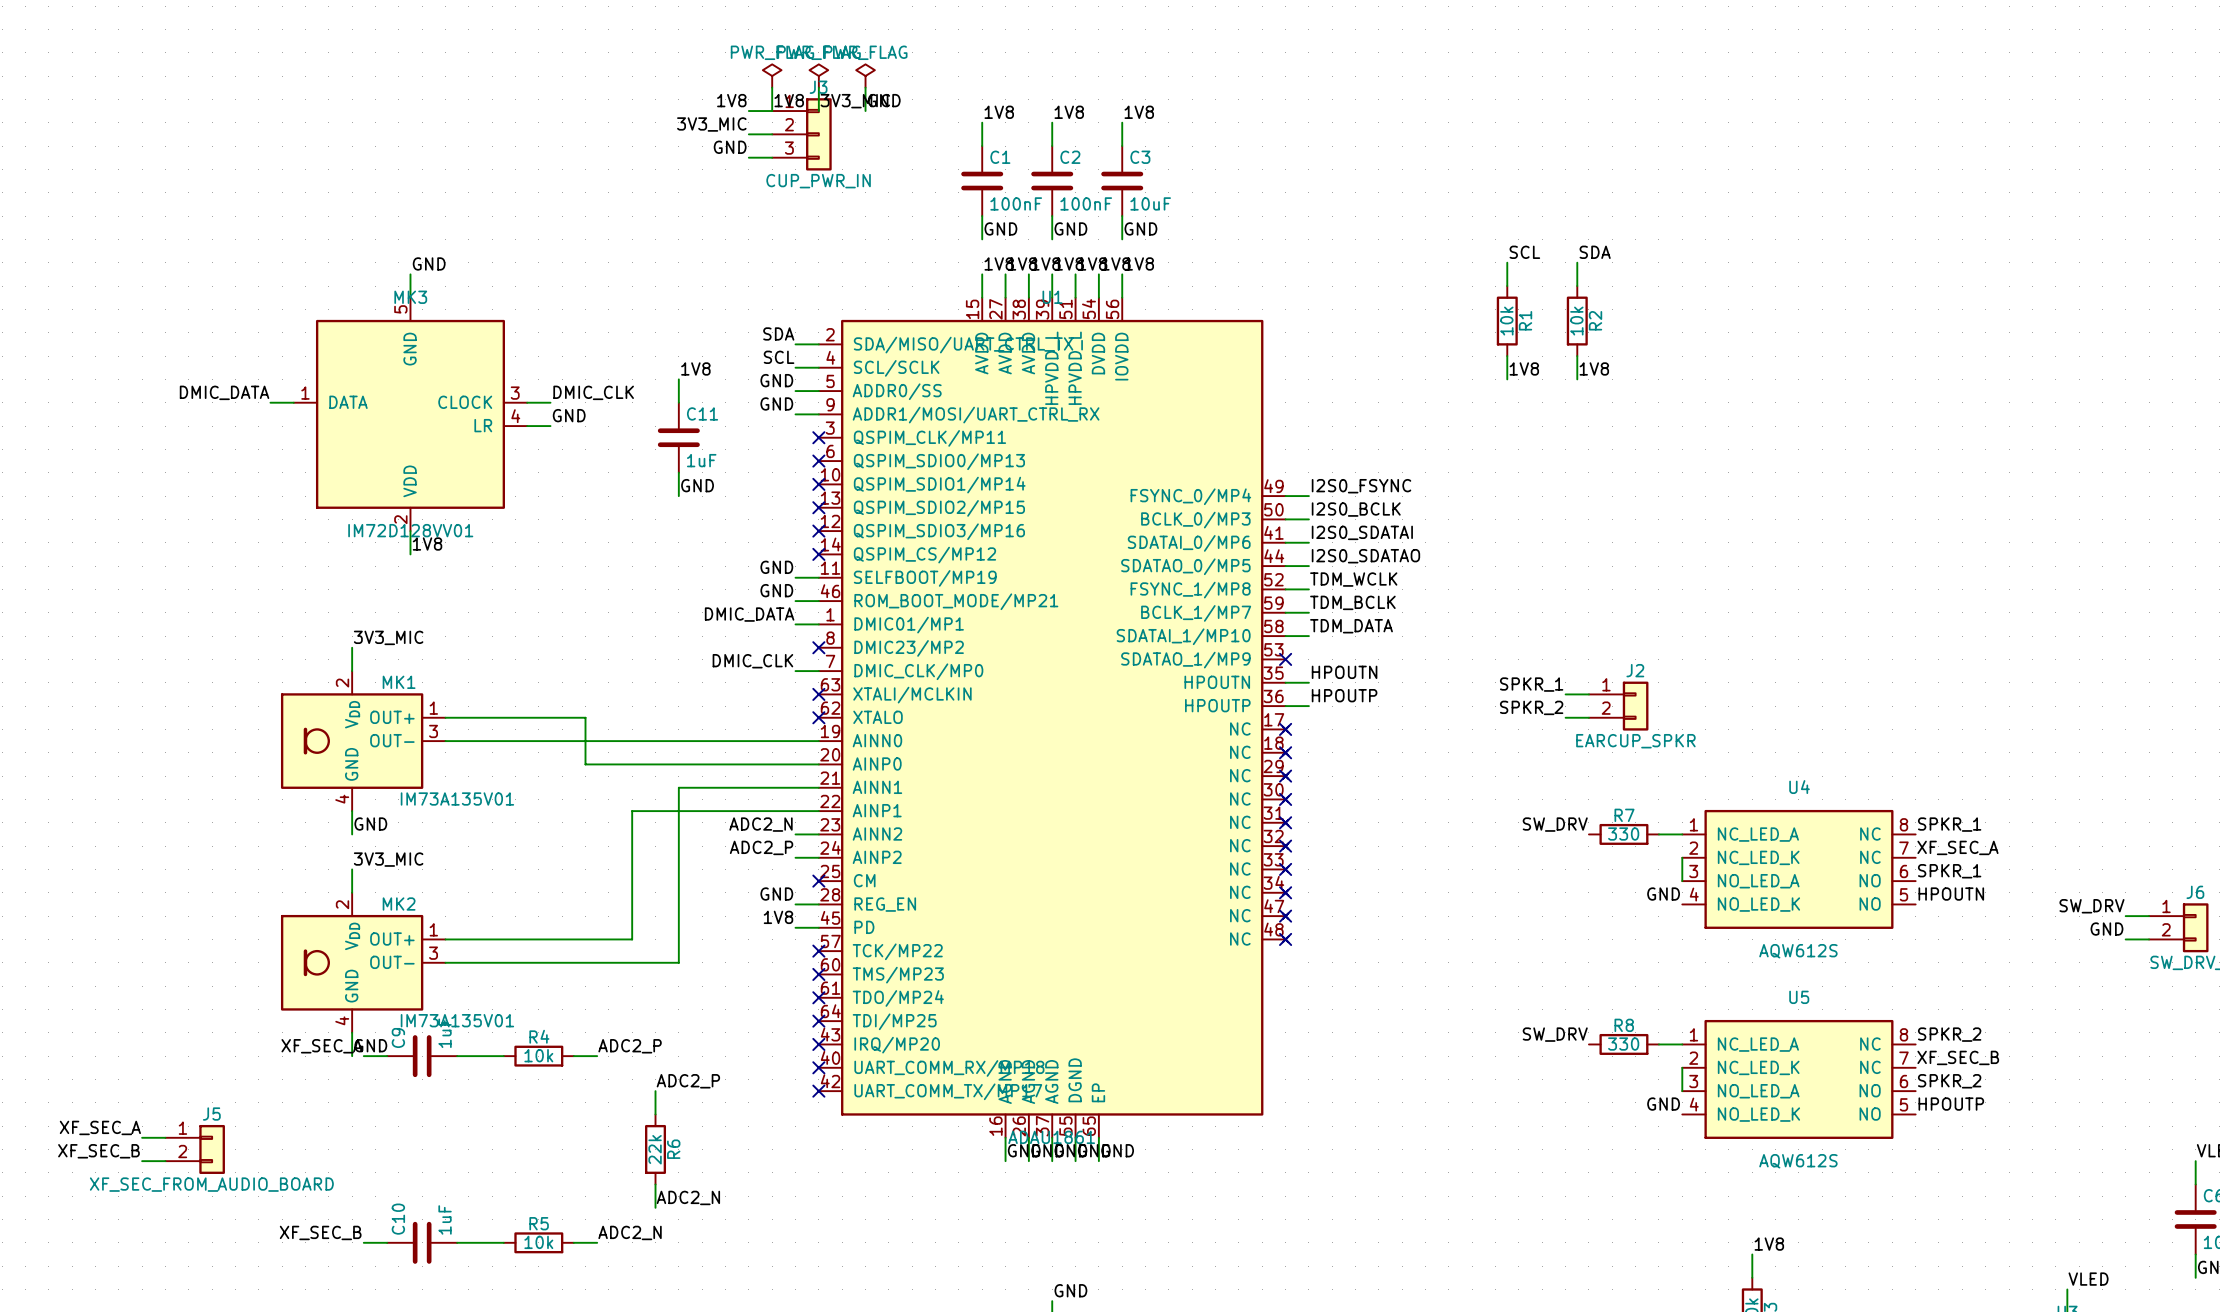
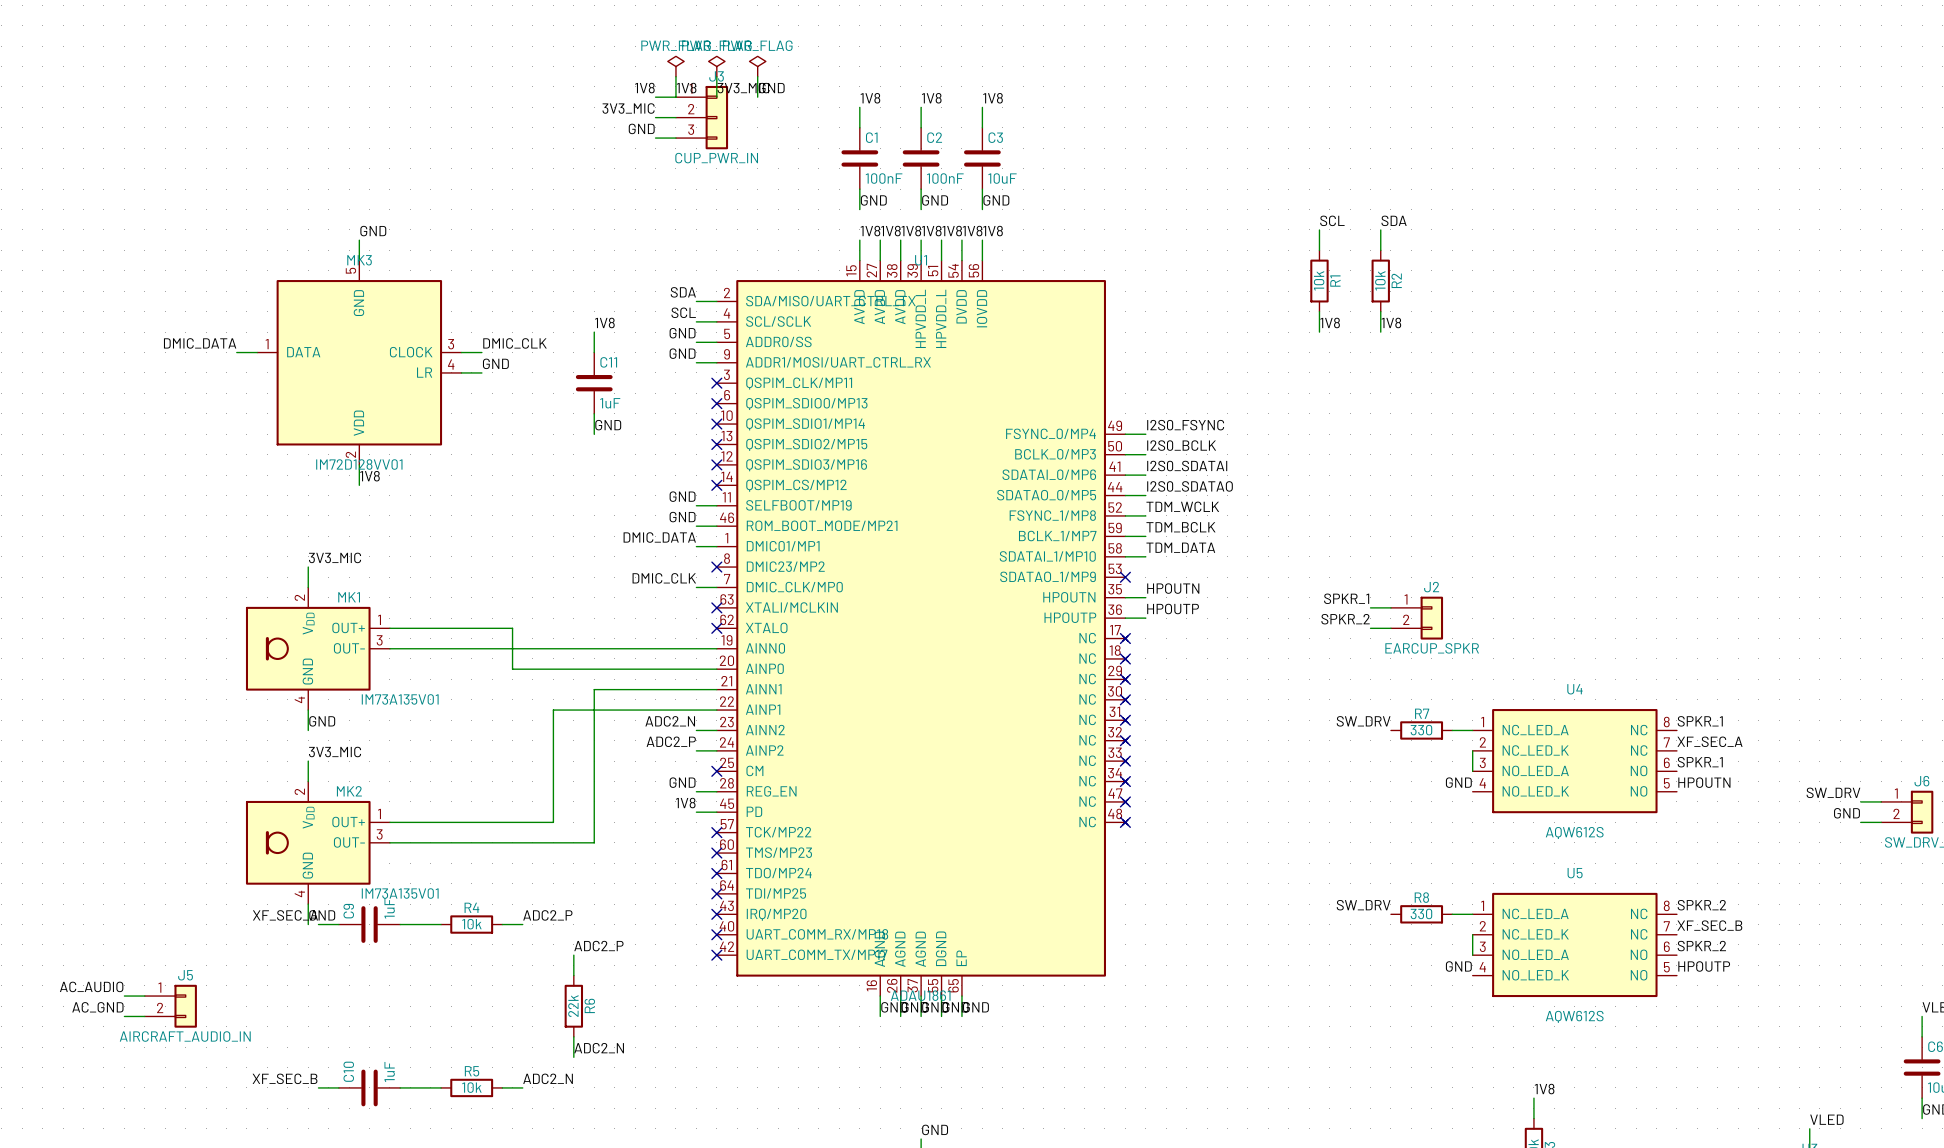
label: XF_SEC_A (100, 1127) -> AC_AUDIO (91, 986)
label: XF_SEC_B (98, 1151) -> AC_GND (97, 1007)
J5 value: XF_SEC_FROM_AUDIO_BOARD (211, 1184) -> AIRCRAFT_AUDIO_IN (185, 1036)

